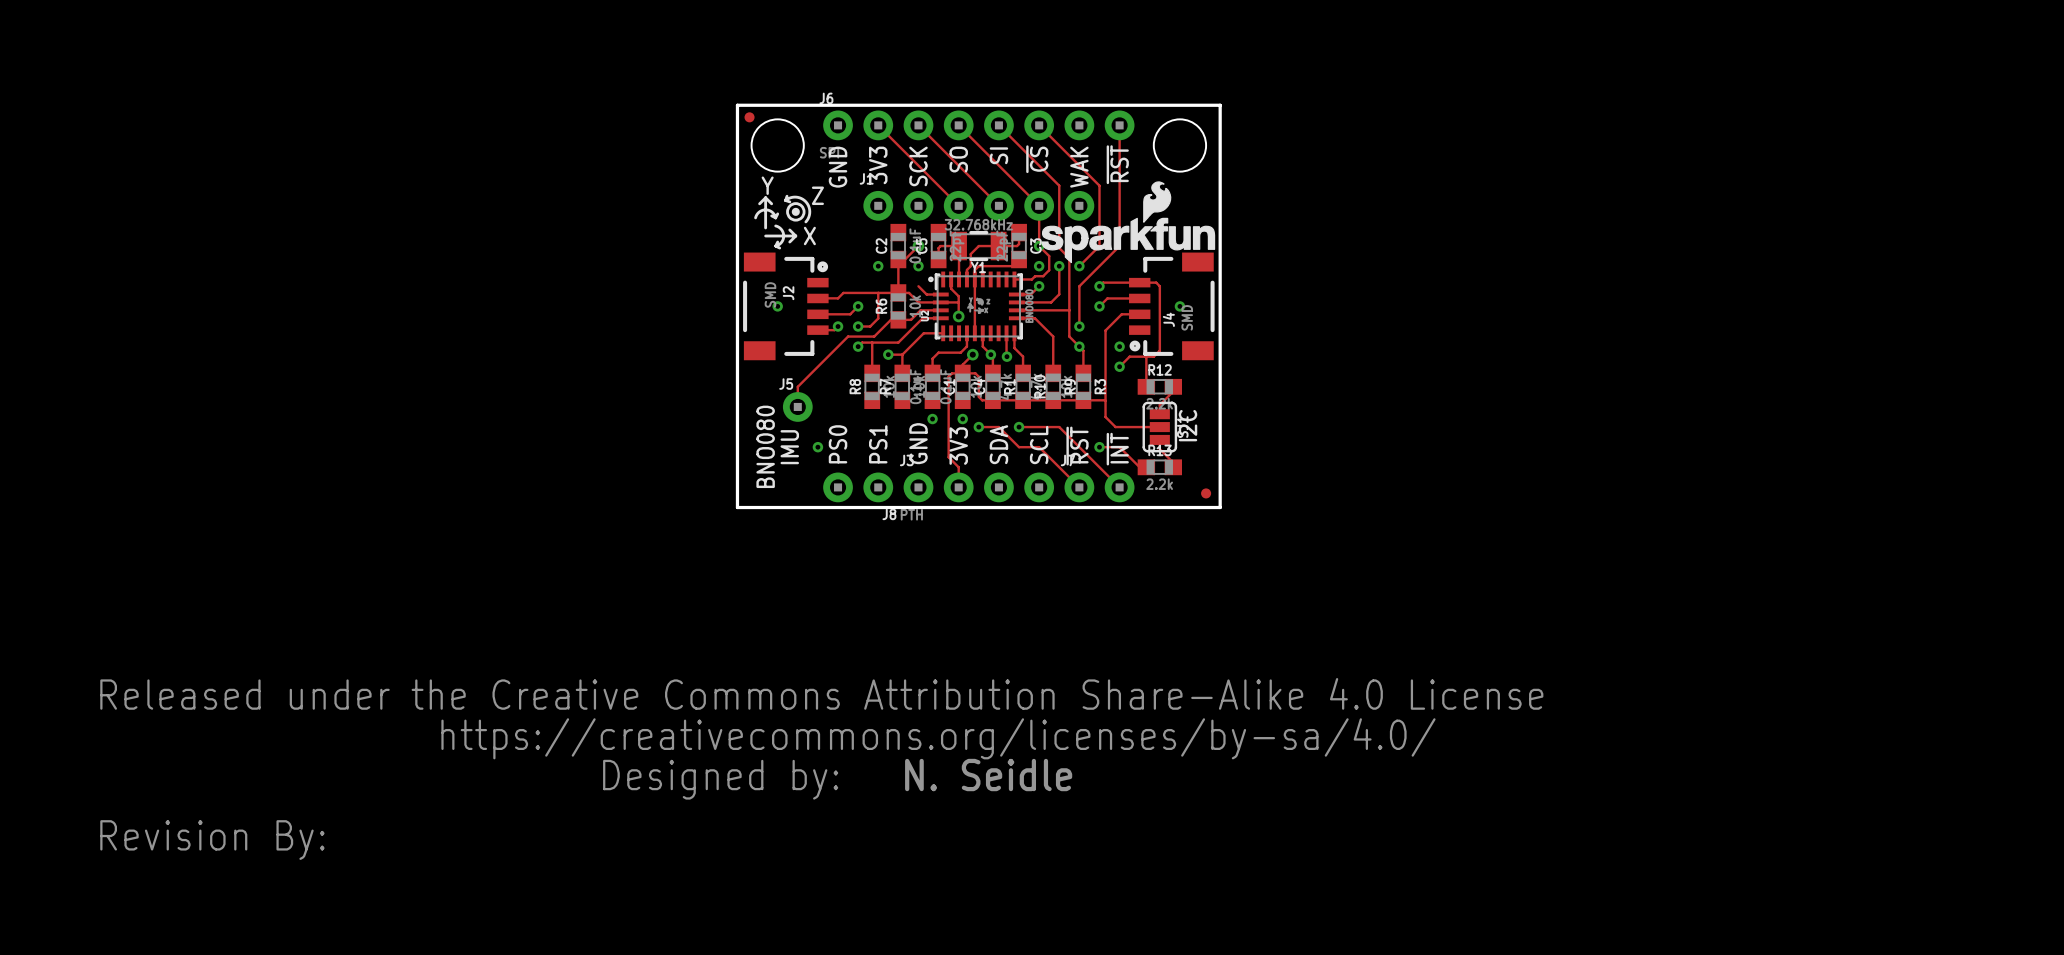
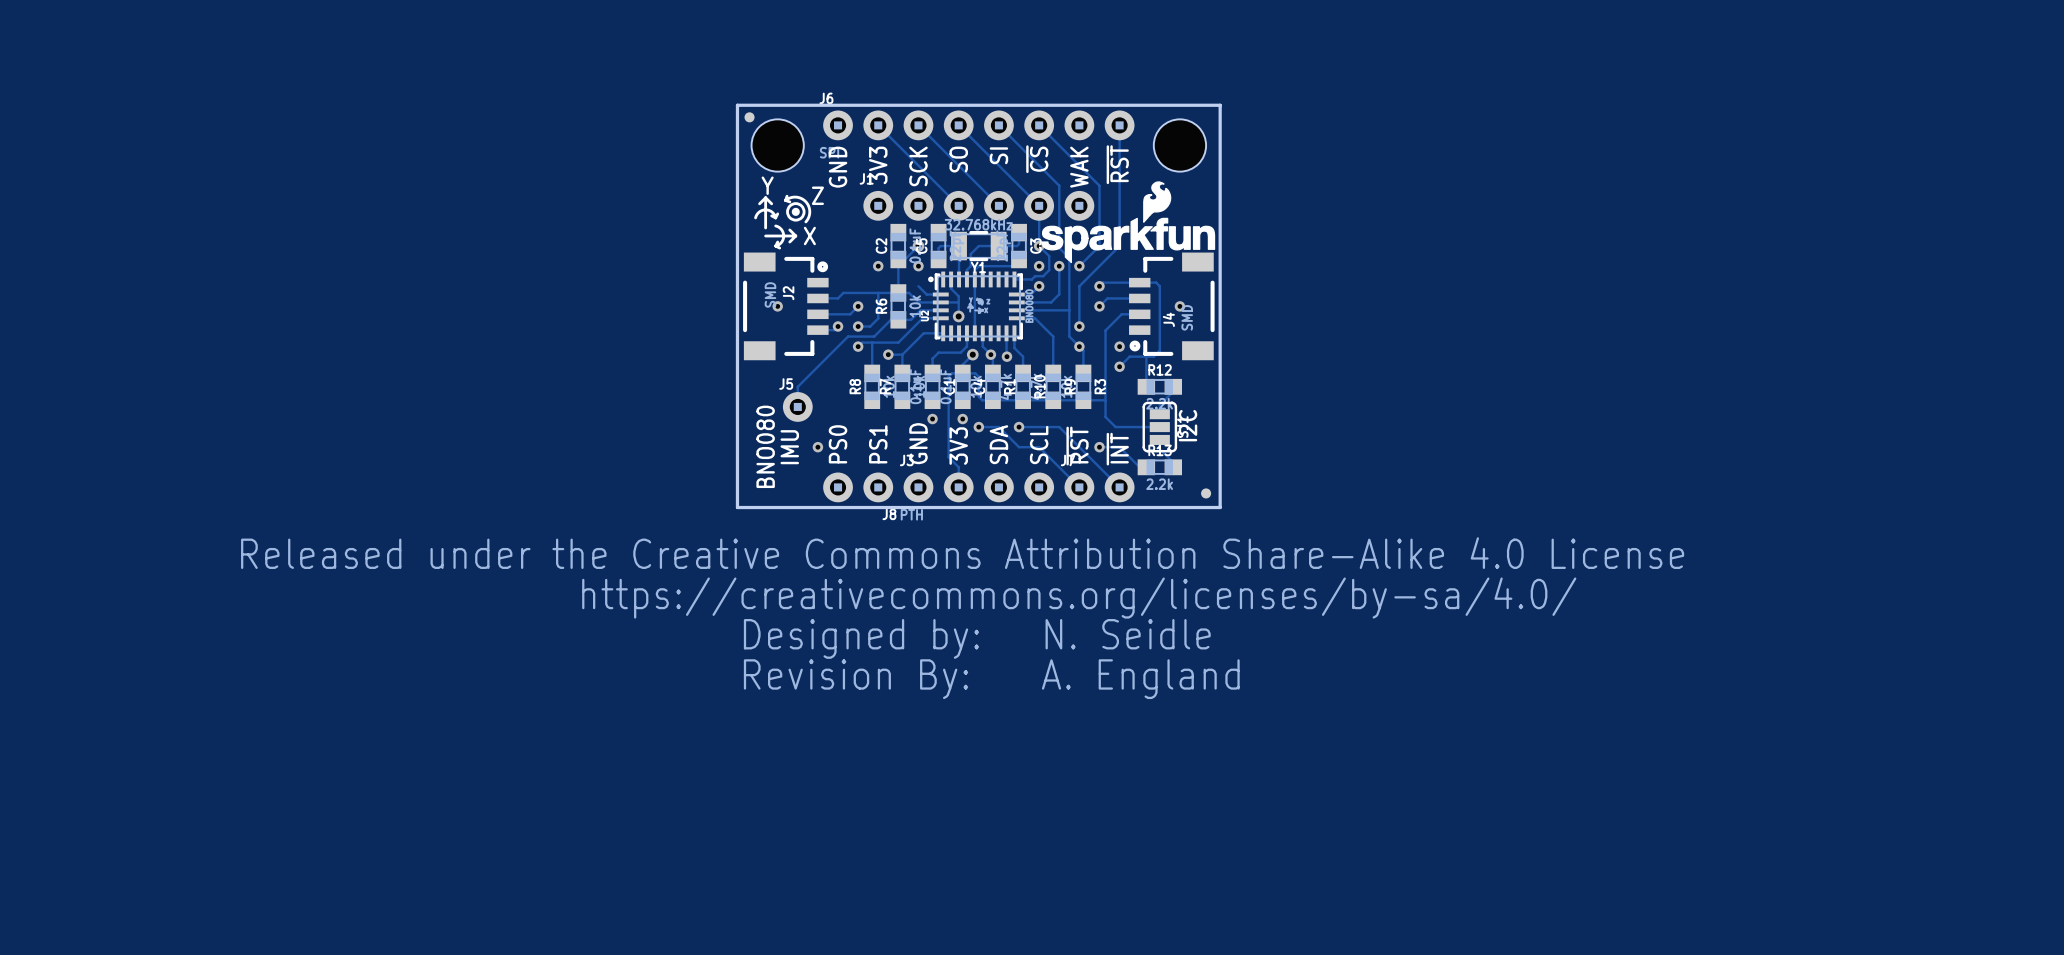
drawing: none -> [743, 659, 969, 700]
text: none -> A. England (1140, 679)
drawing position: (821, 738) -> (962, 598)
text position: N. Seidle (988, 775) -> N. Seidle (1128, 634)
drawing: [100, 820, 325, 860] -> none

